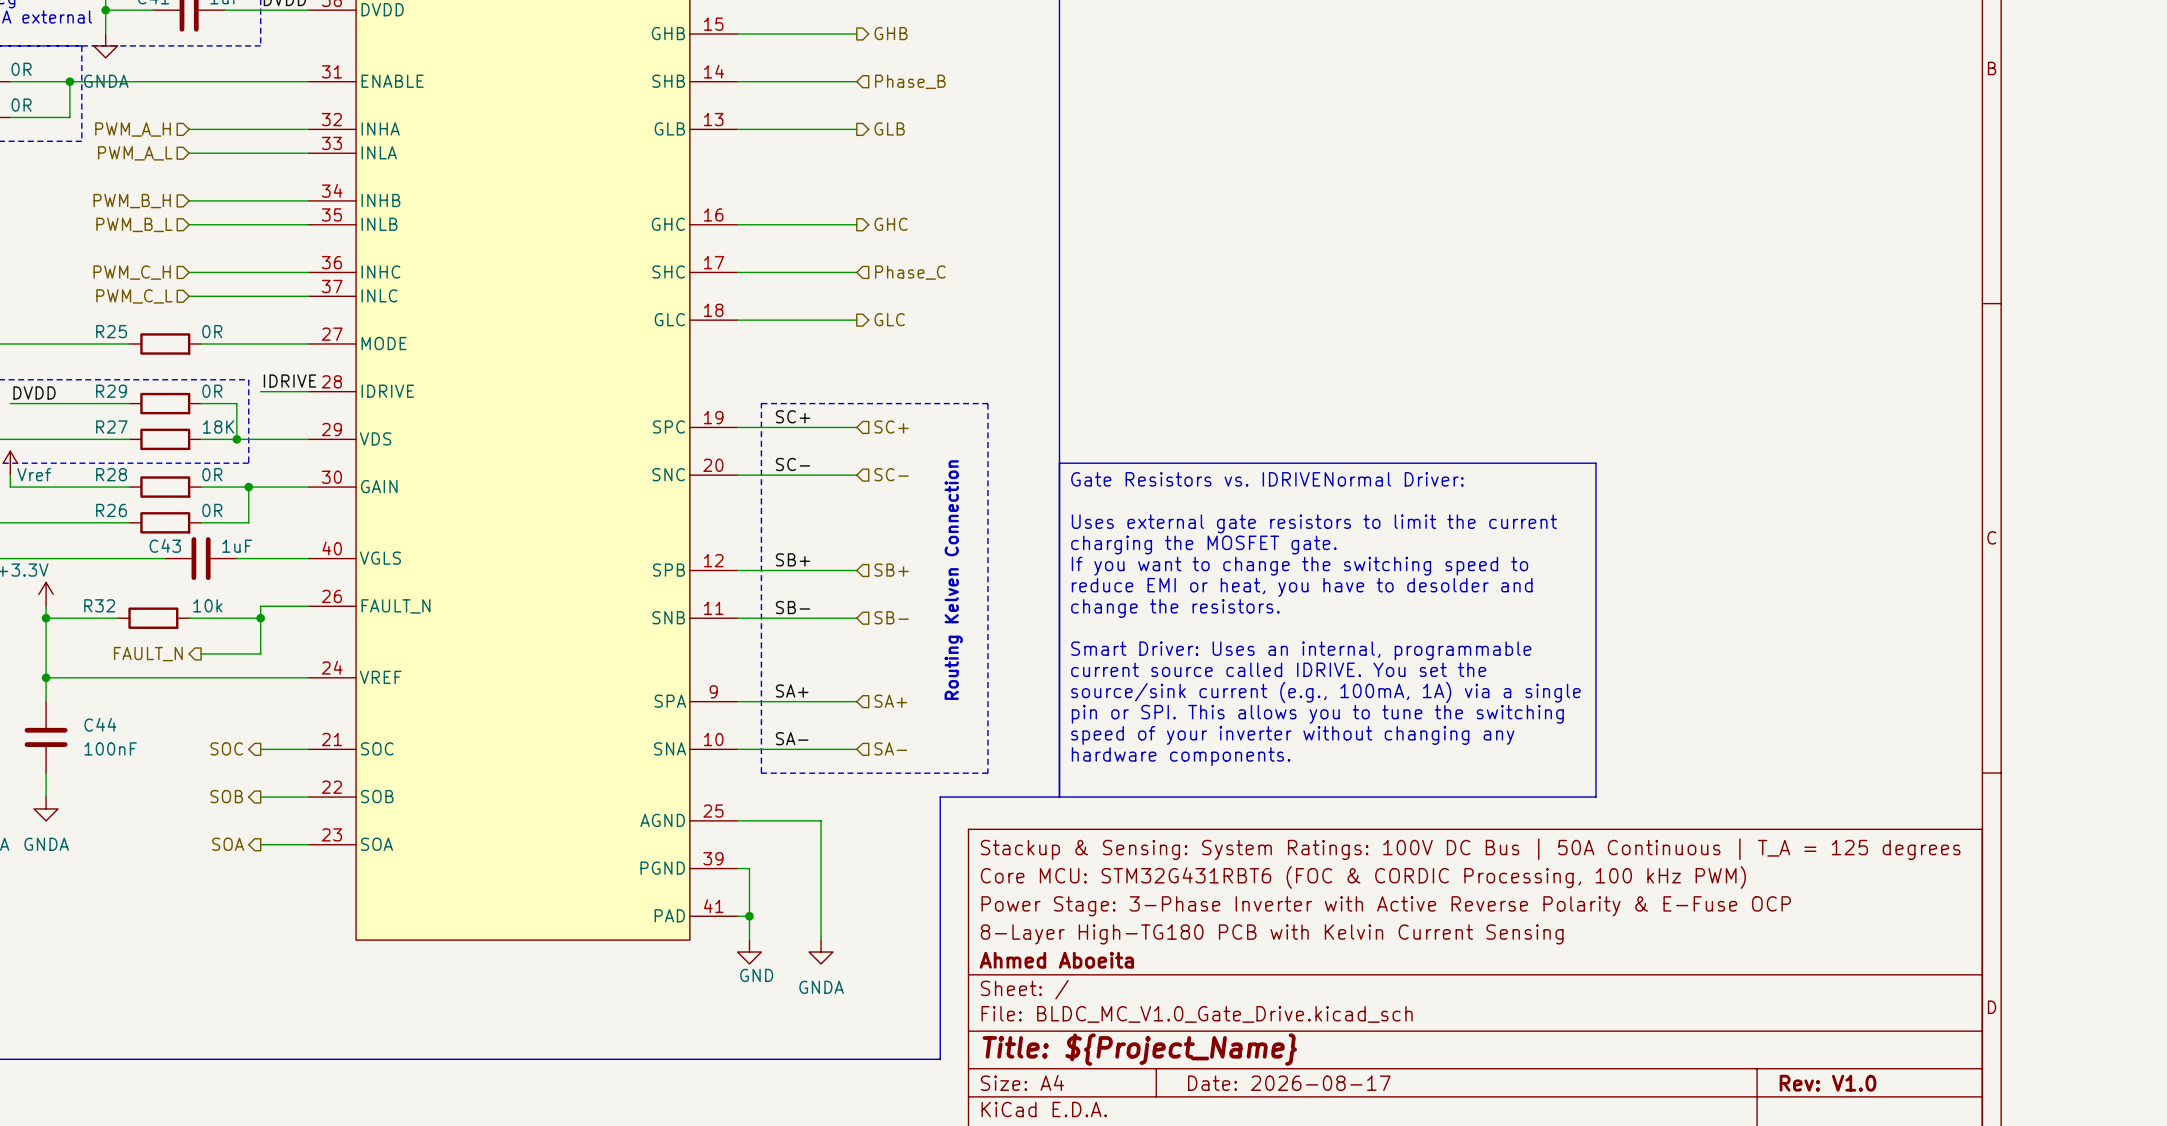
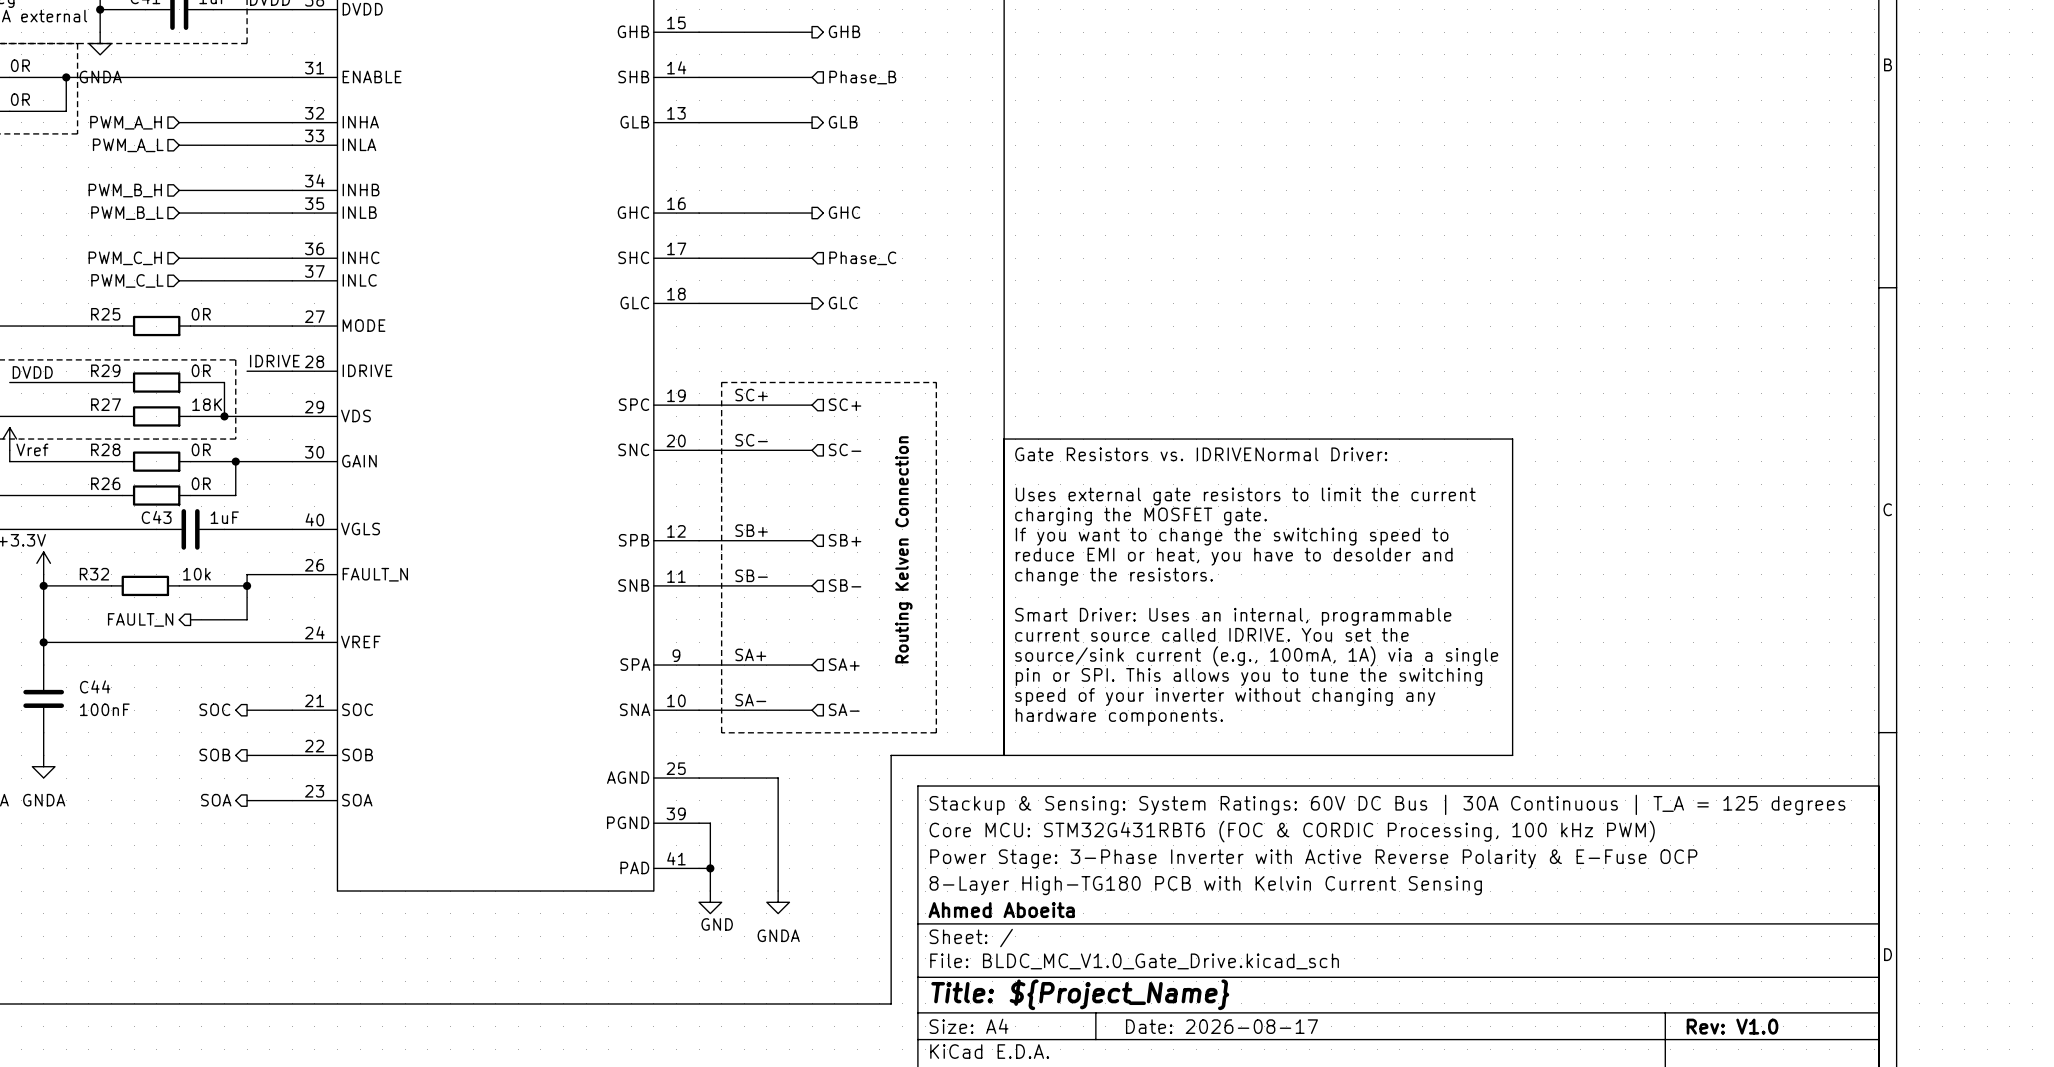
title block: Stackup & Sensing: System Ratings: 100V DC Bus | 50A Continuous | T_A = 125 degrees (1470, 849) -> Stackup & Sensing: System Ratings: 60V DC Bus | 30A Continuous | T_A = 125 degrees (1387, 804)

